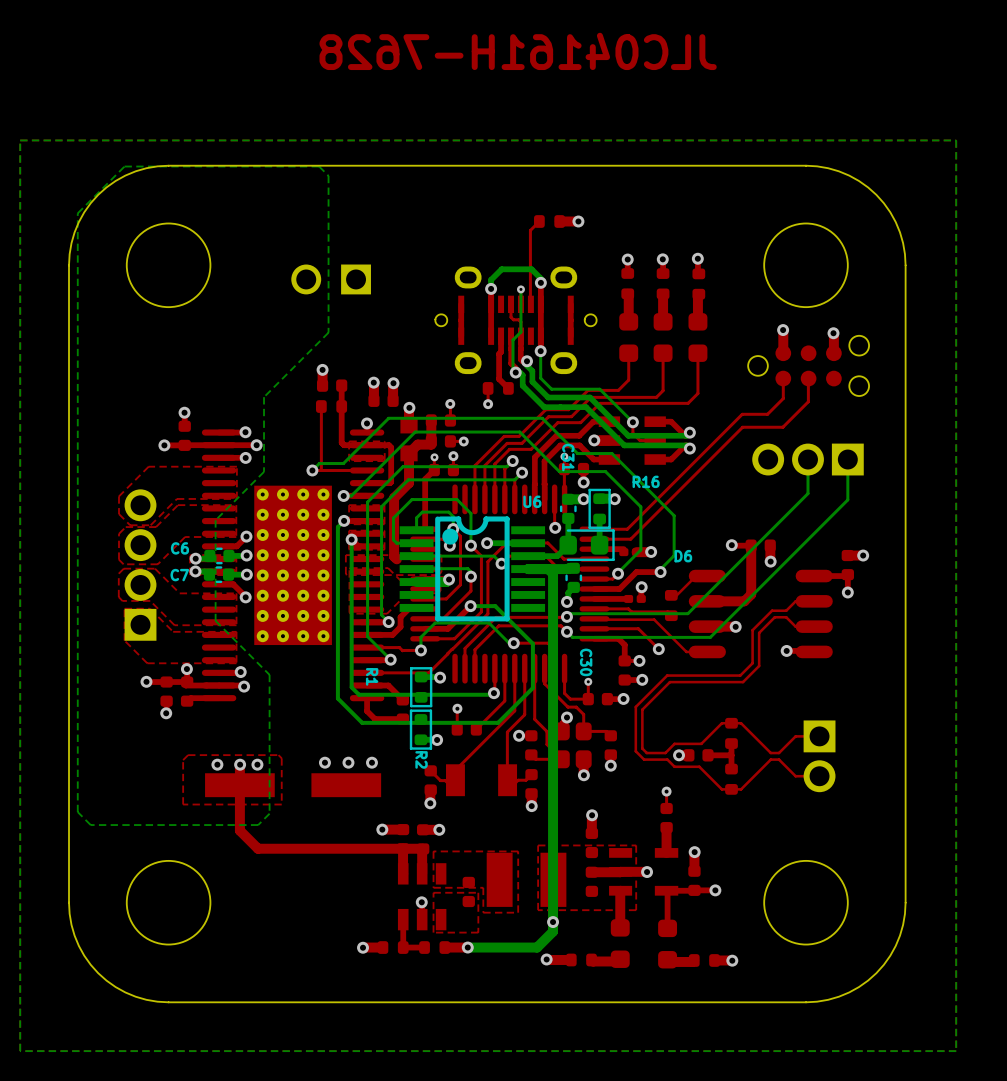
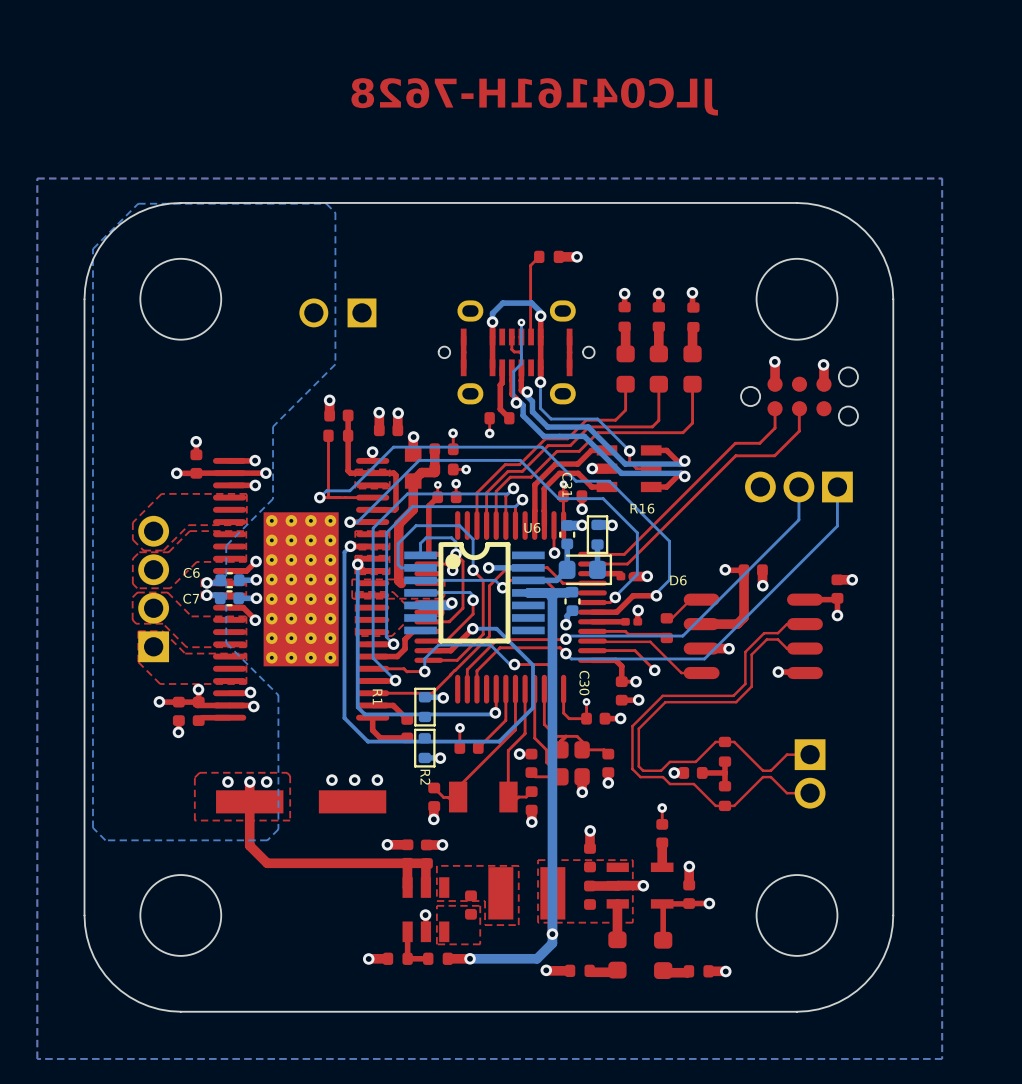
top track: (544, 683) (567, 707) (576, 707) (583, 714) (583, 722) -> (544, 703) (544, 724) (556, 736) (577, 736) (582, 741)
via: (566, 717) -> none

